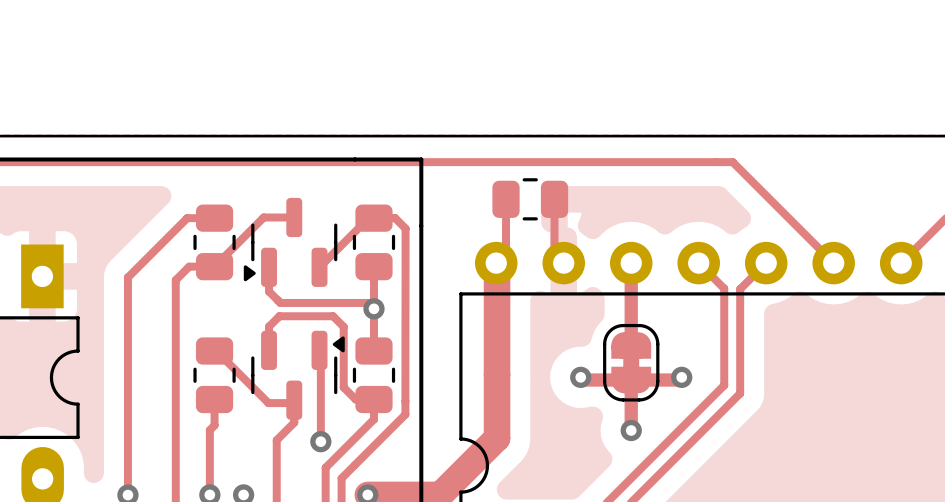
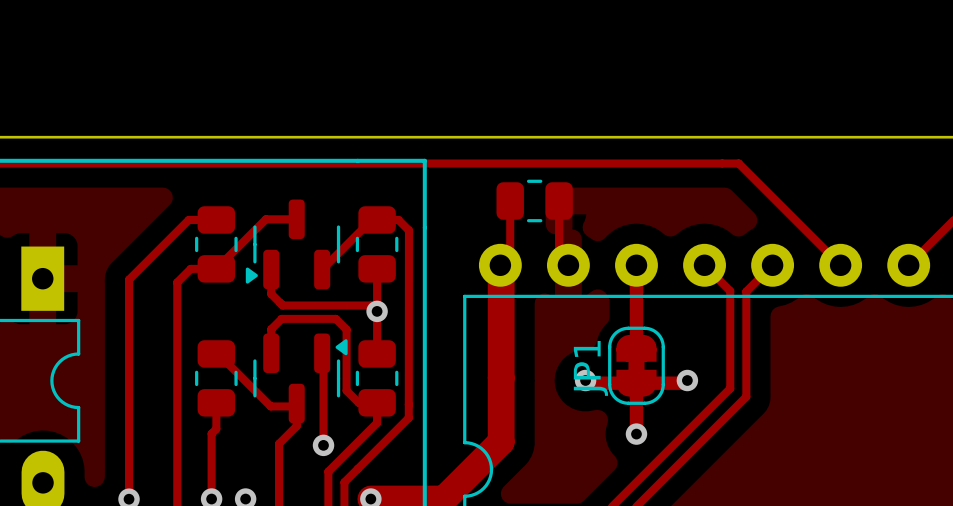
JP1 name: none -> JP1 (590, 368)

